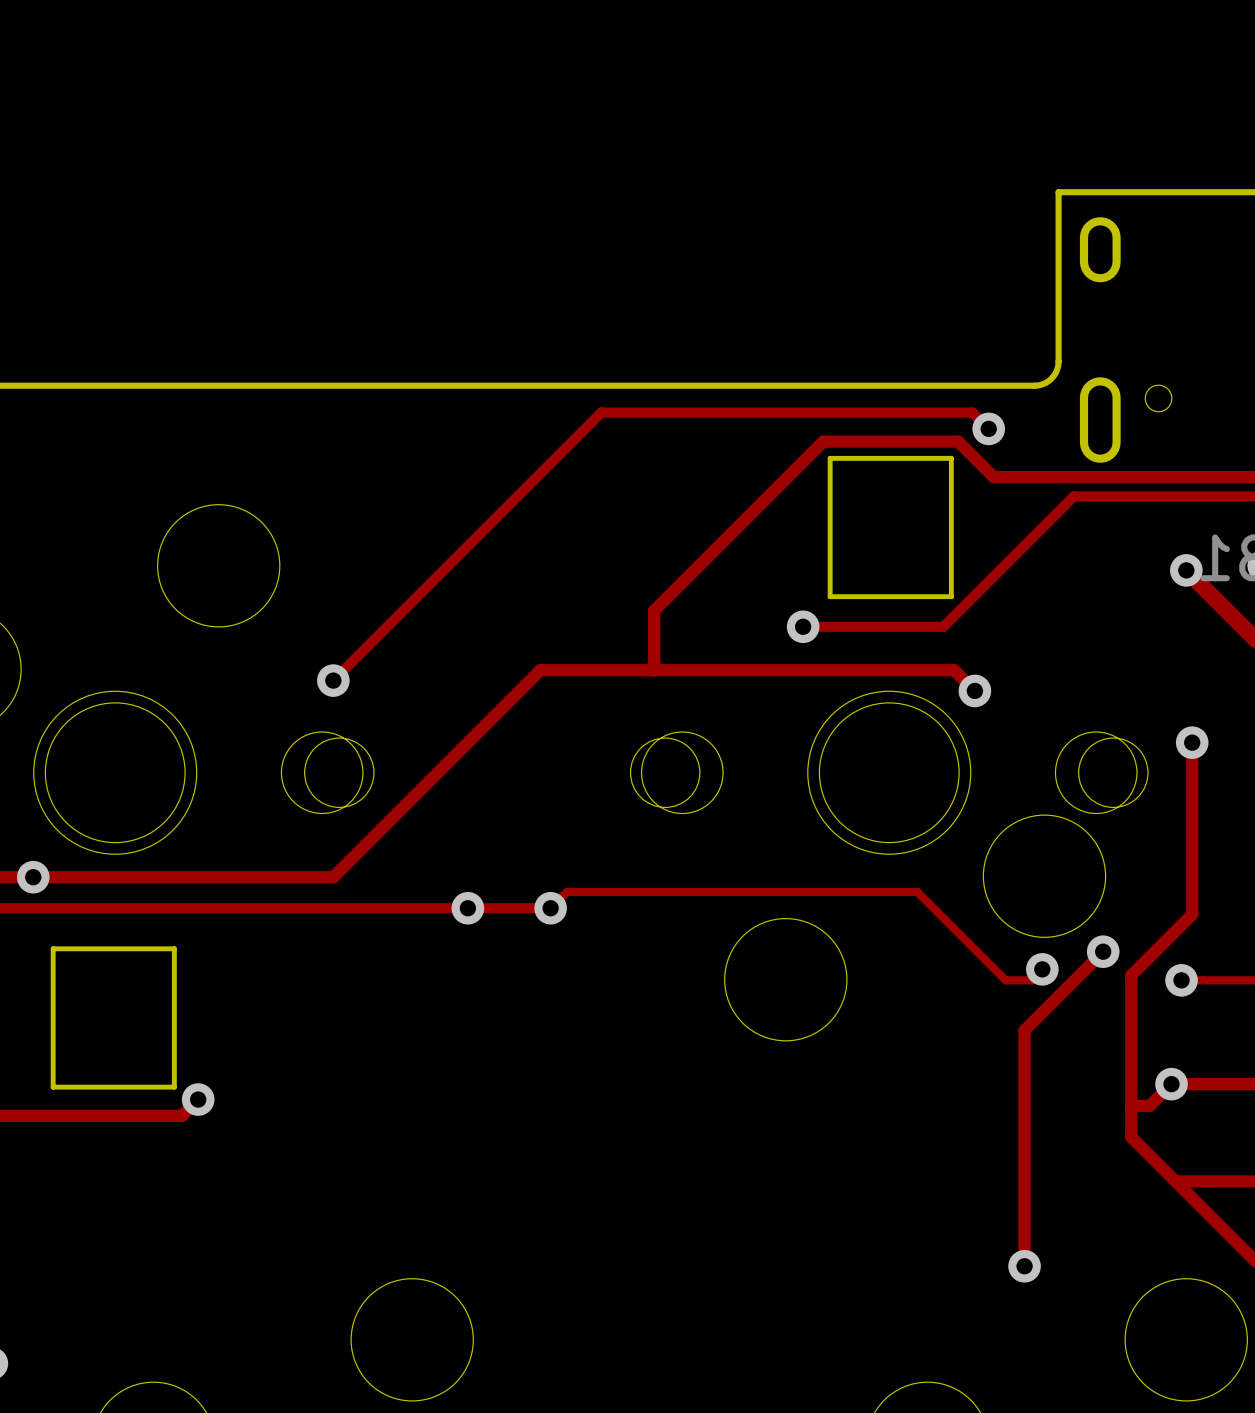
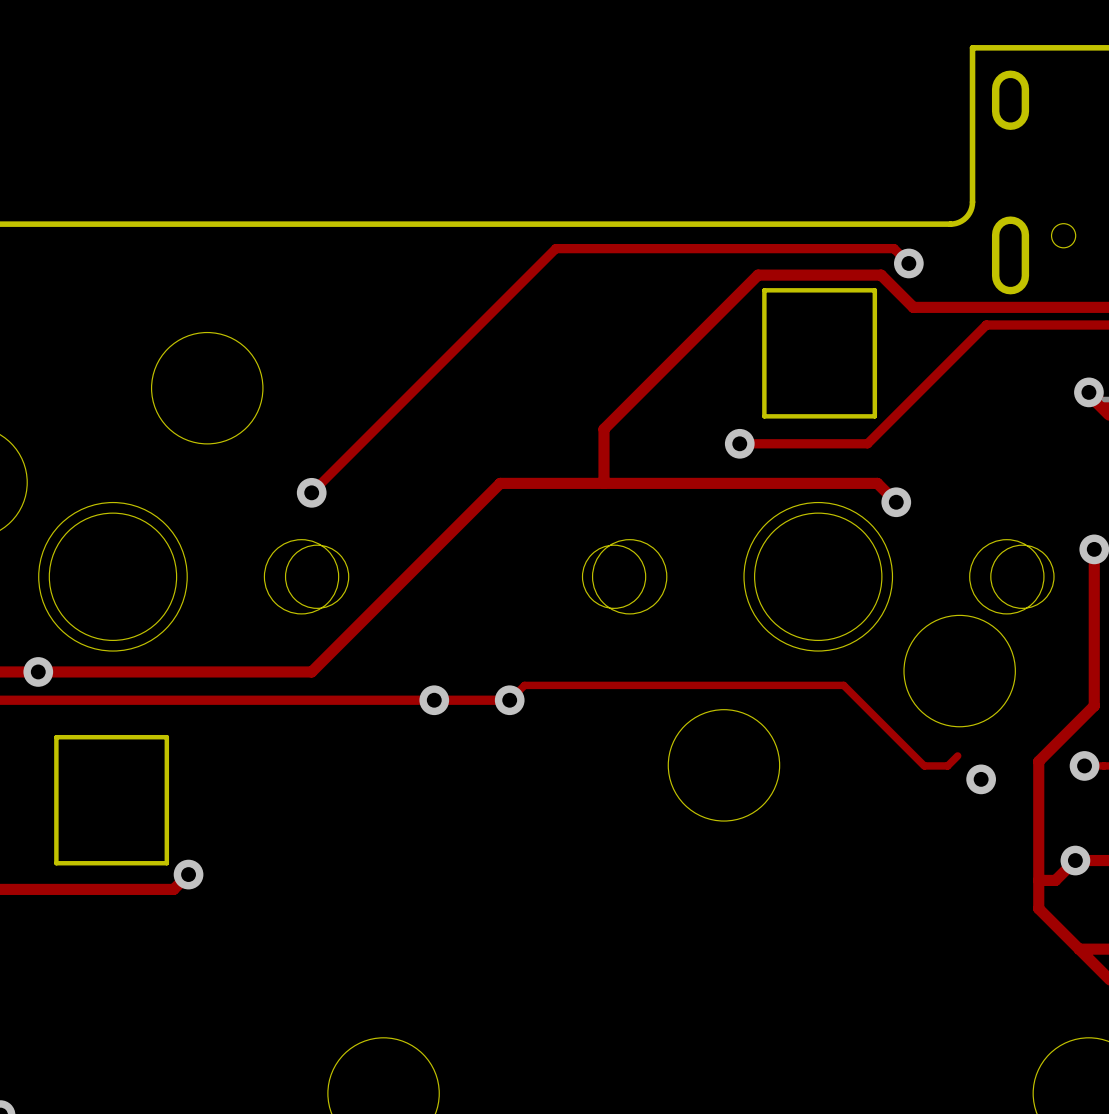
track: (1103, 951) (1024, 1030) (1024, 1266) -> none
via: (1103, 951) -> none
via position: (1042, 969) -> (981, 779)
via: (1024, 1266) -> none

